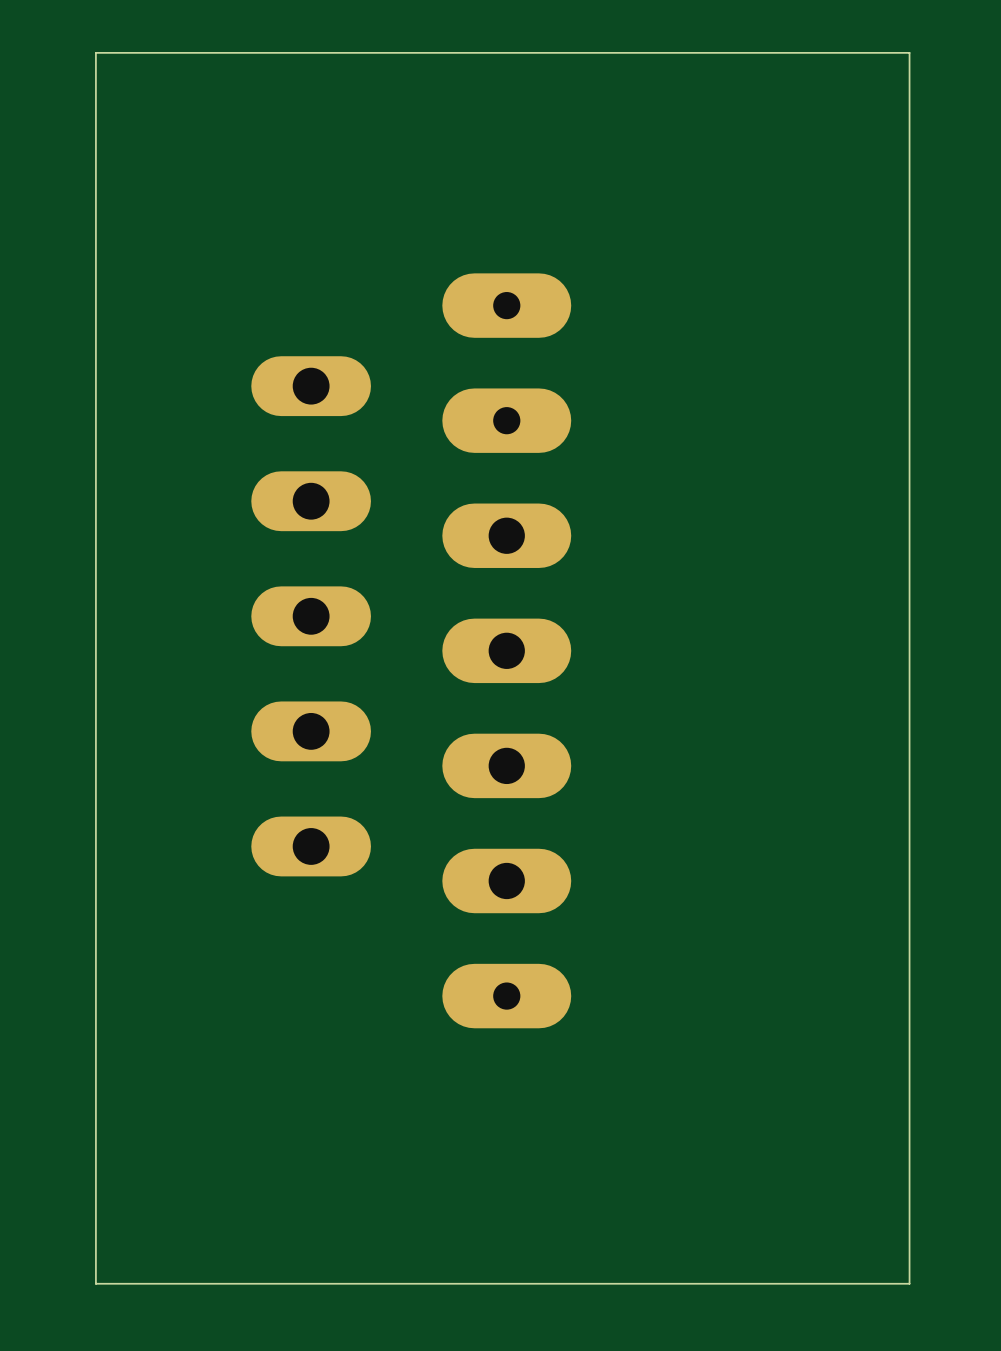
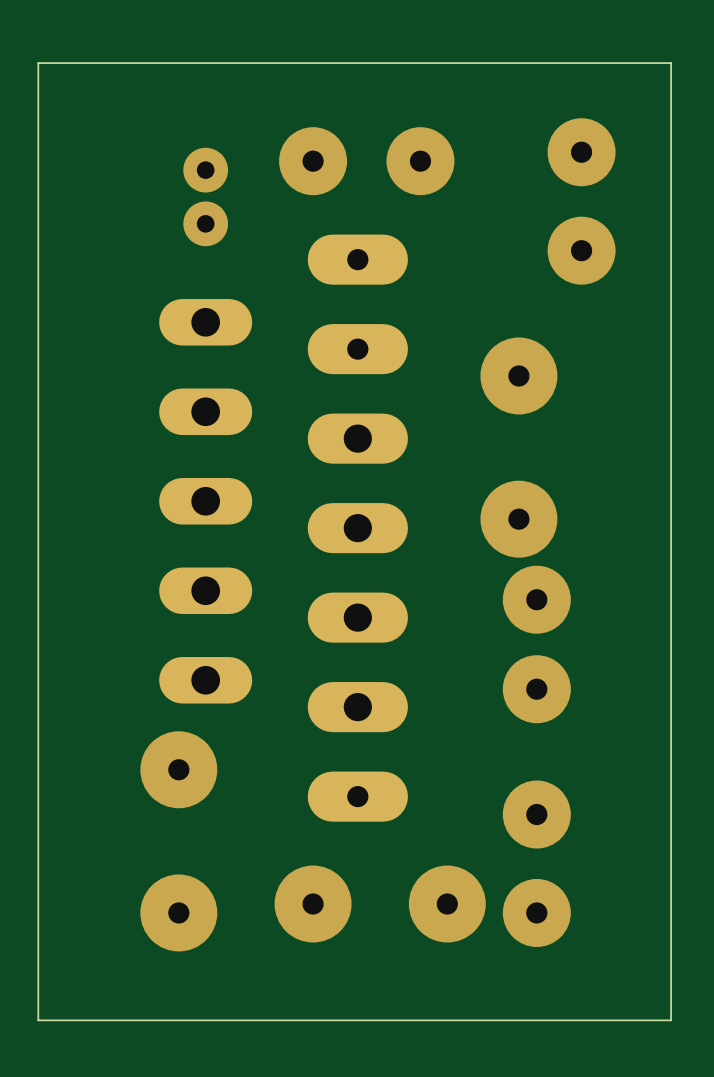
via: none -> (581, 152)
via: none -> (313, 161)
via: none -> (420, 161)
via: none -> (205, 170)
via: none -> (205, 223)
via: none -> (581, 250)
via: none -> (518, 375)
via: none -> (518, 519)
via: none -> (536, 599)
via: none -> (536, 689)
via: none -> (178, 769)
via: none -> (536, 814)
via: none -> (313, 904)
via: none -> (447, 904)
via: none -> (178, 912)
via: none -> (536, 912)

